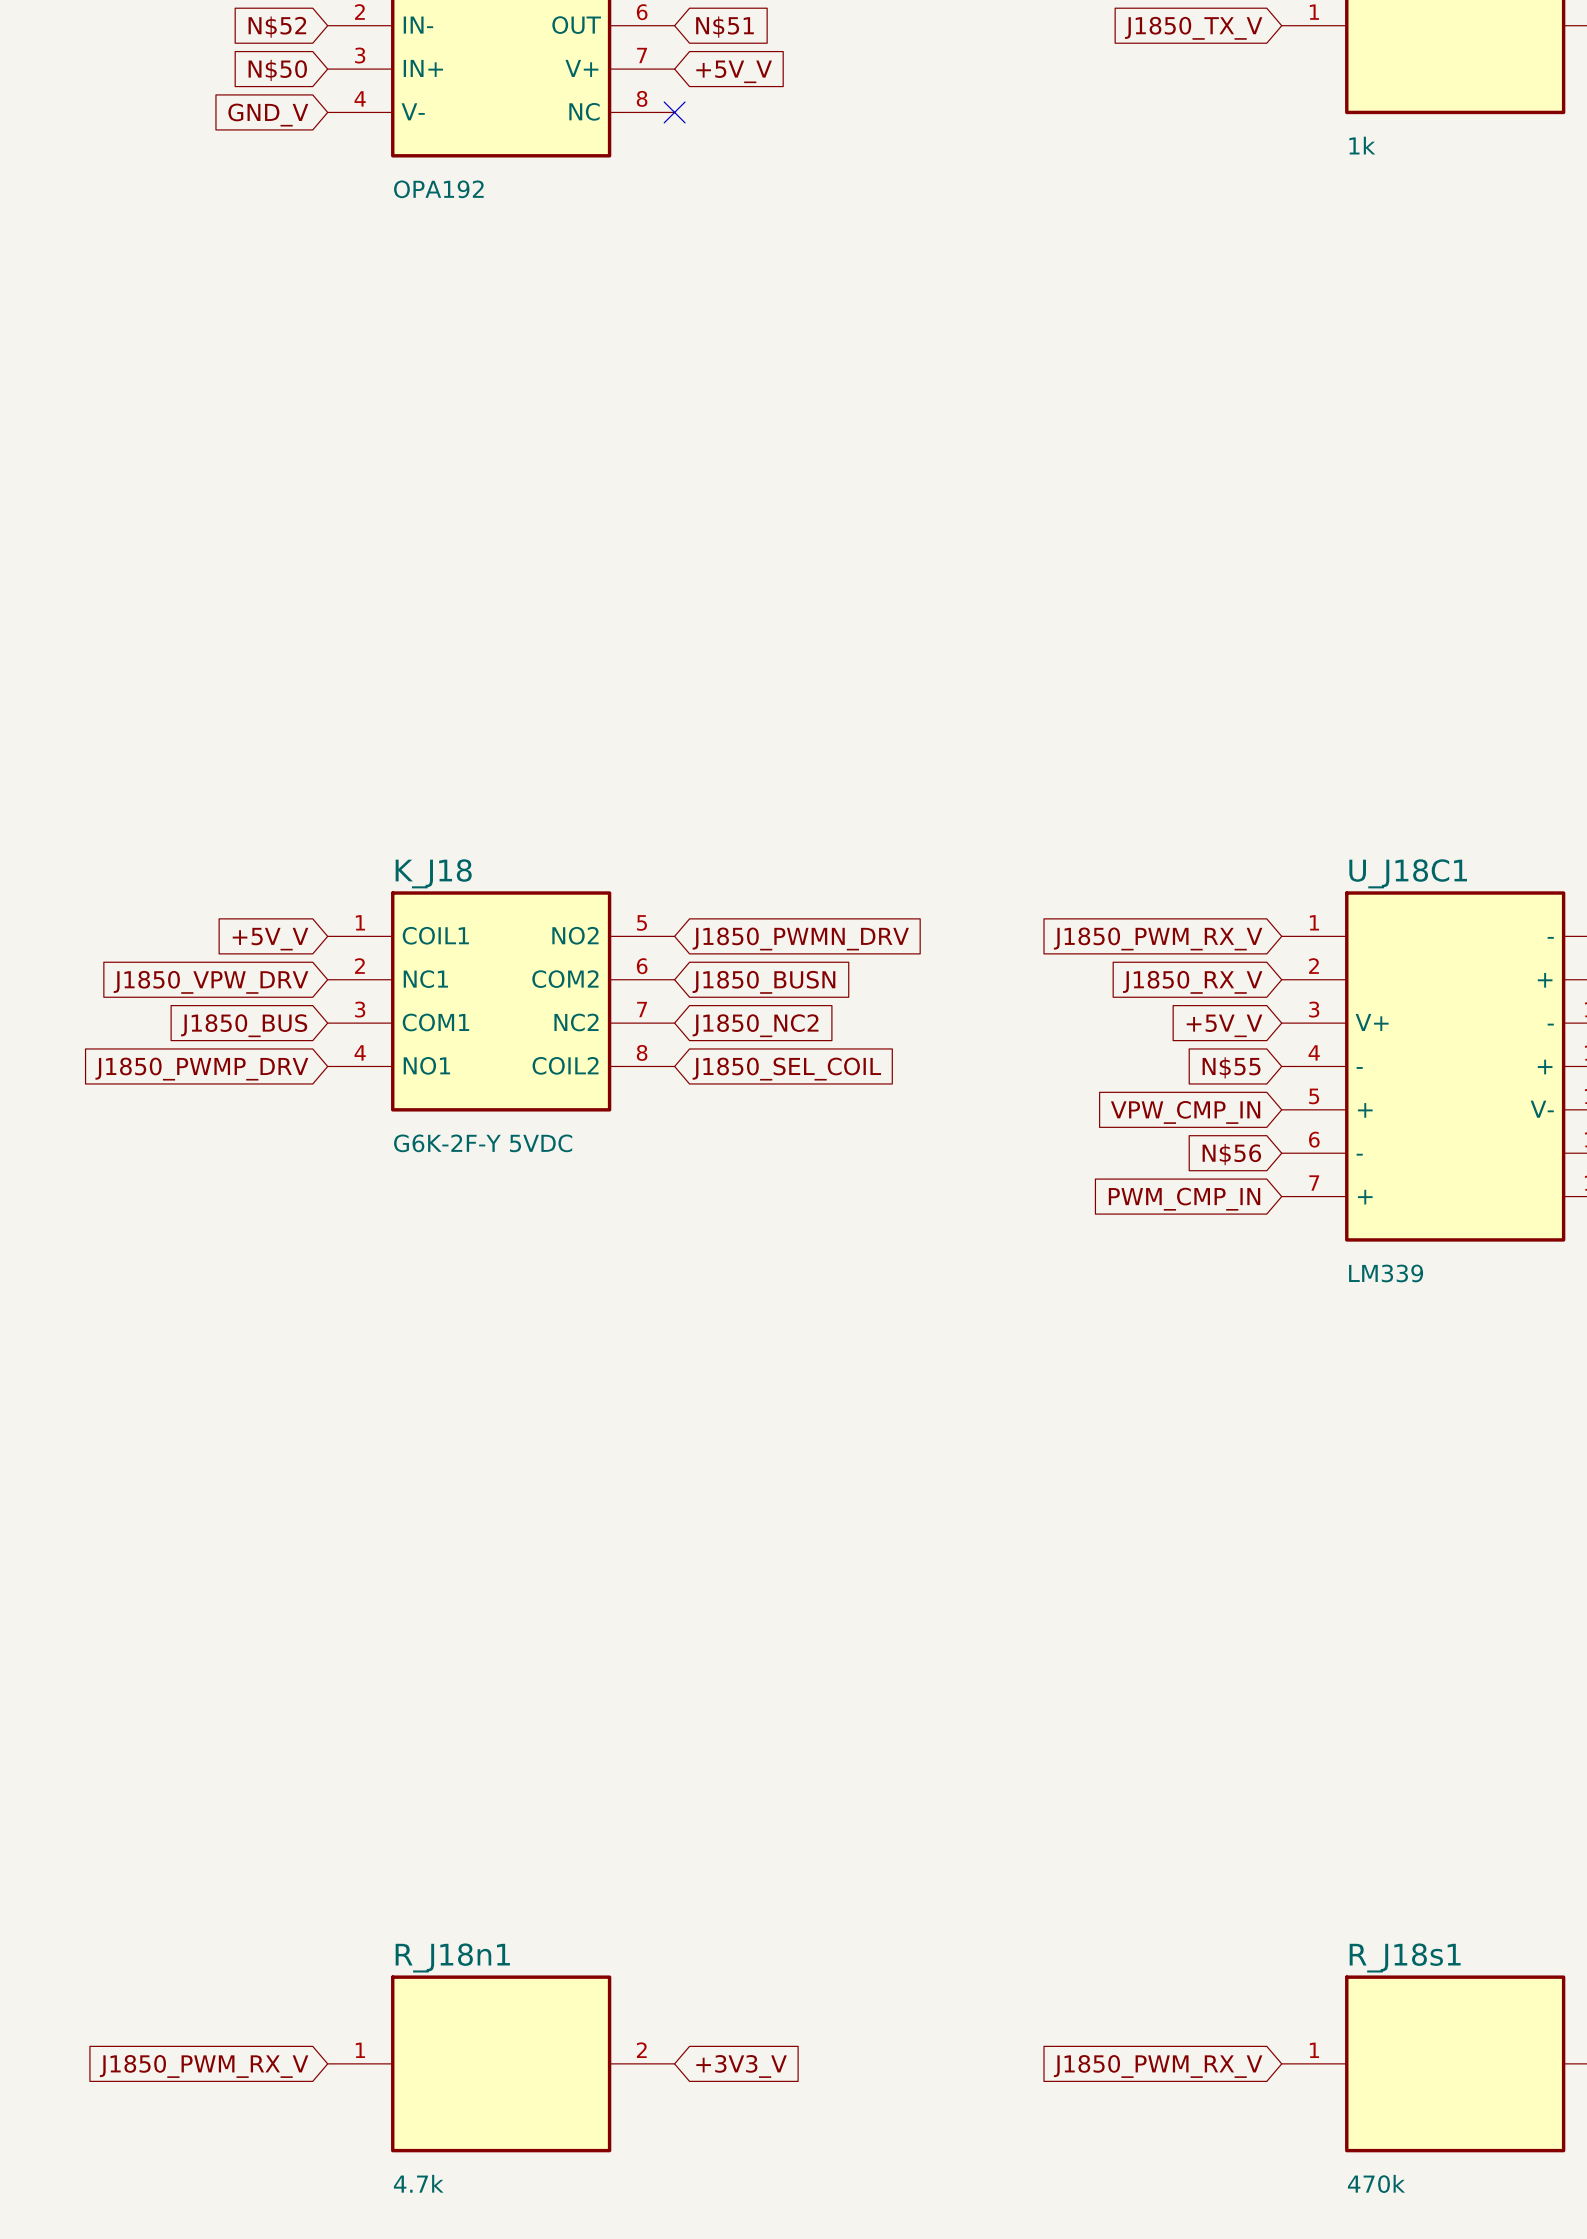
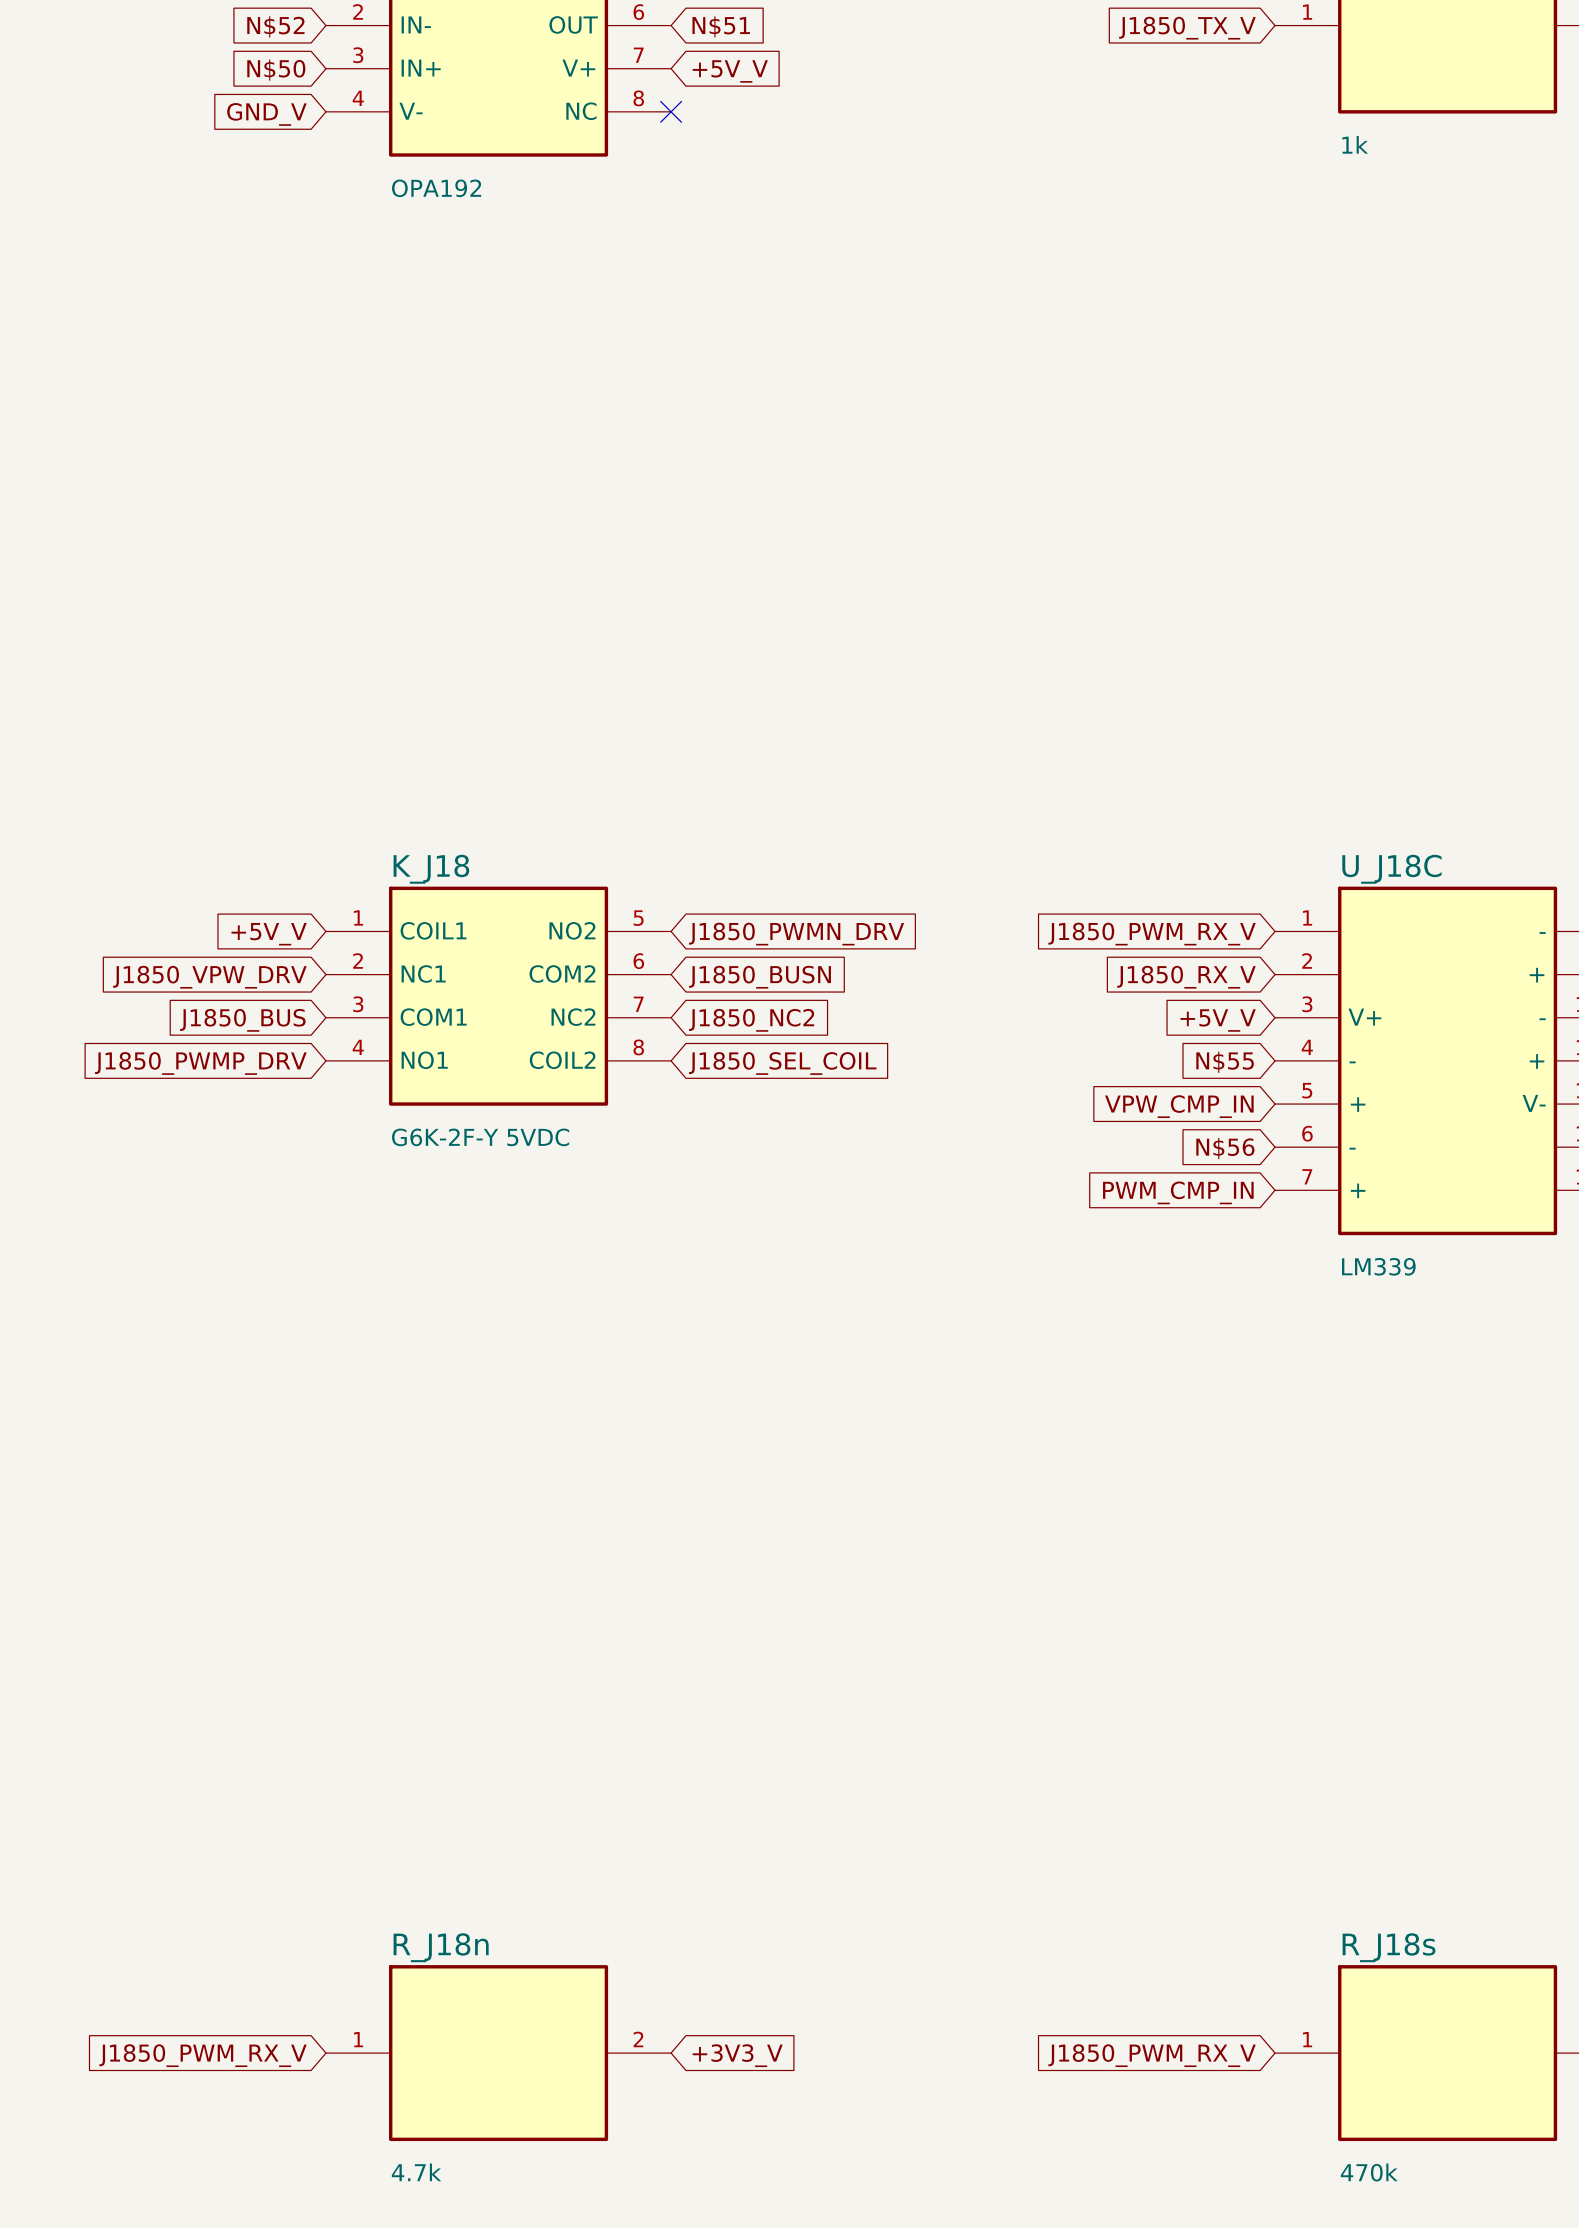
U_J18C1 name: U_J18C1 (1408, 873) -> U_J18C (1391, 869)
R_J18n1 name: R_J18n1 (452, 1957) -> R_J18n (441, 1947)
R_J18s1 name: R_J18s1 (1405, 1957) -> R_J18s (1389, 1947)

